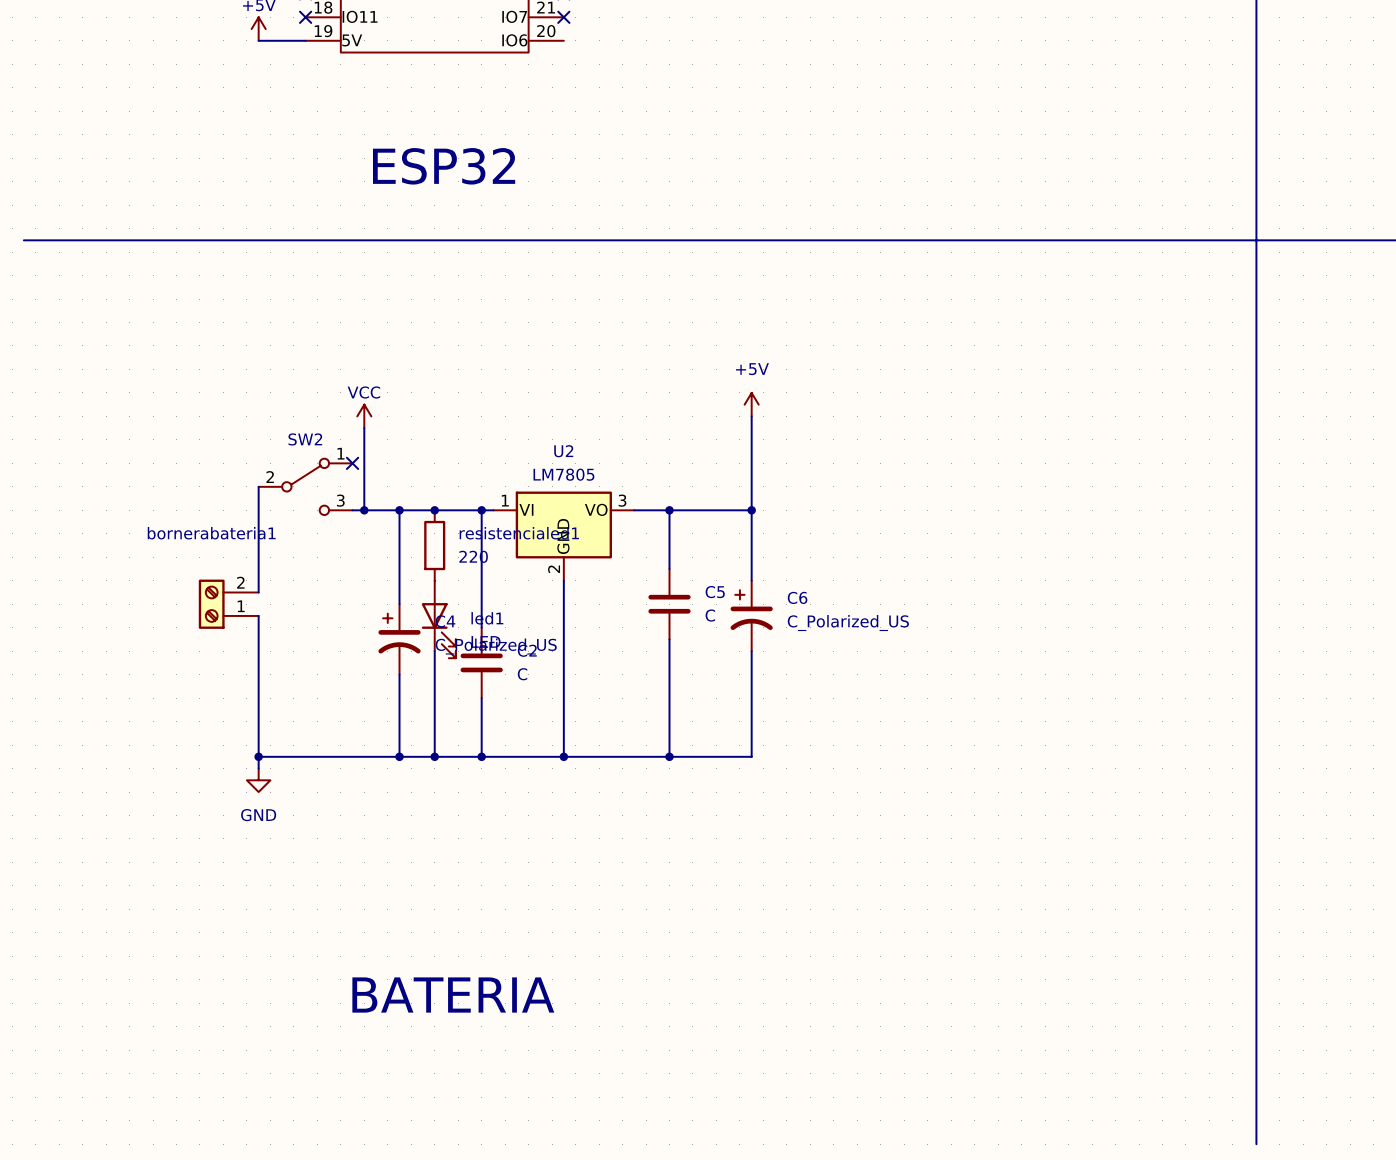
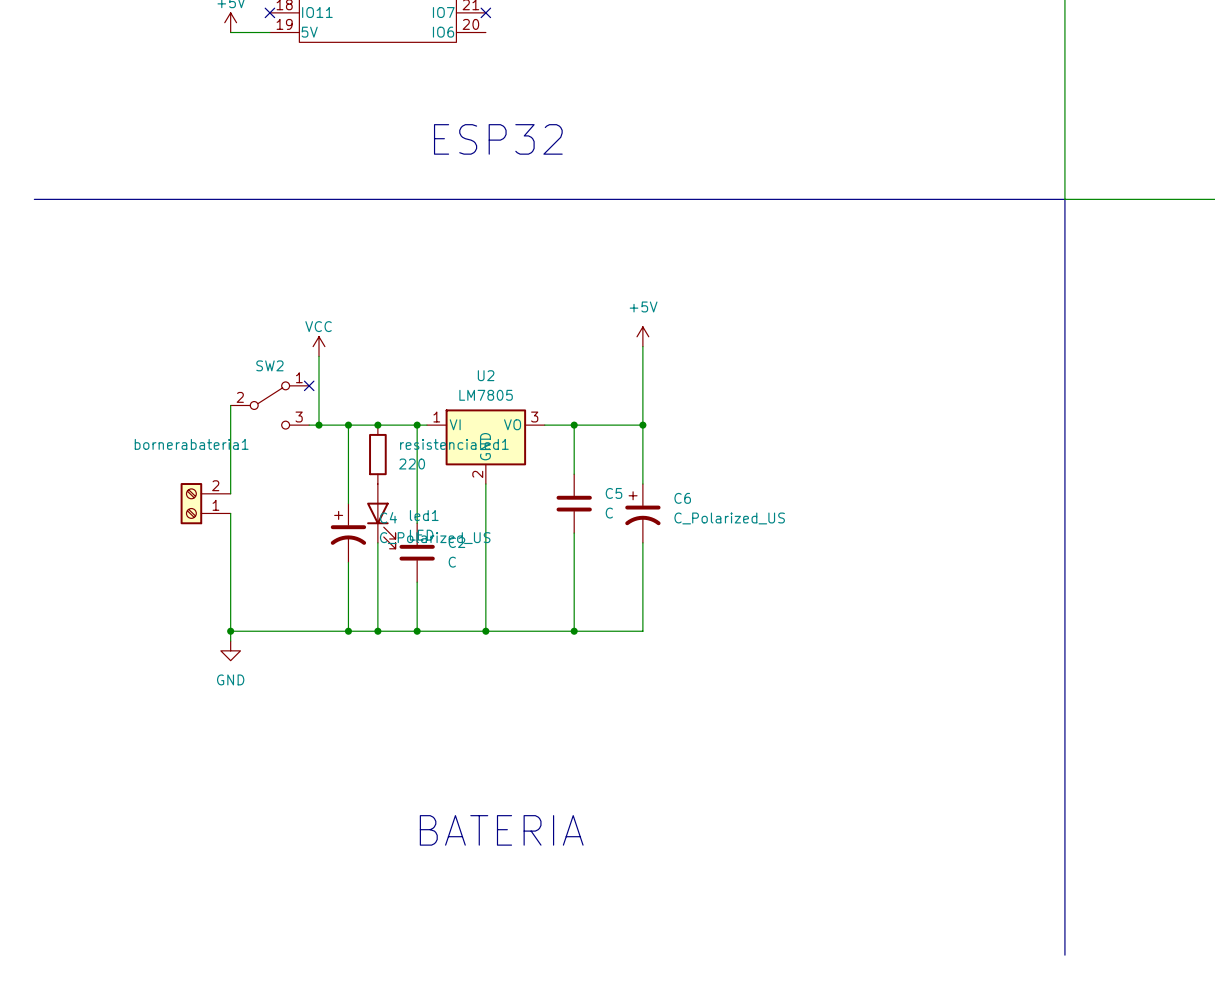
text position: ESP32 (444, 166) -> ESP32 (498, 139)
text position: BATERIA (453, 995) -> BATERIA (501, 830)

